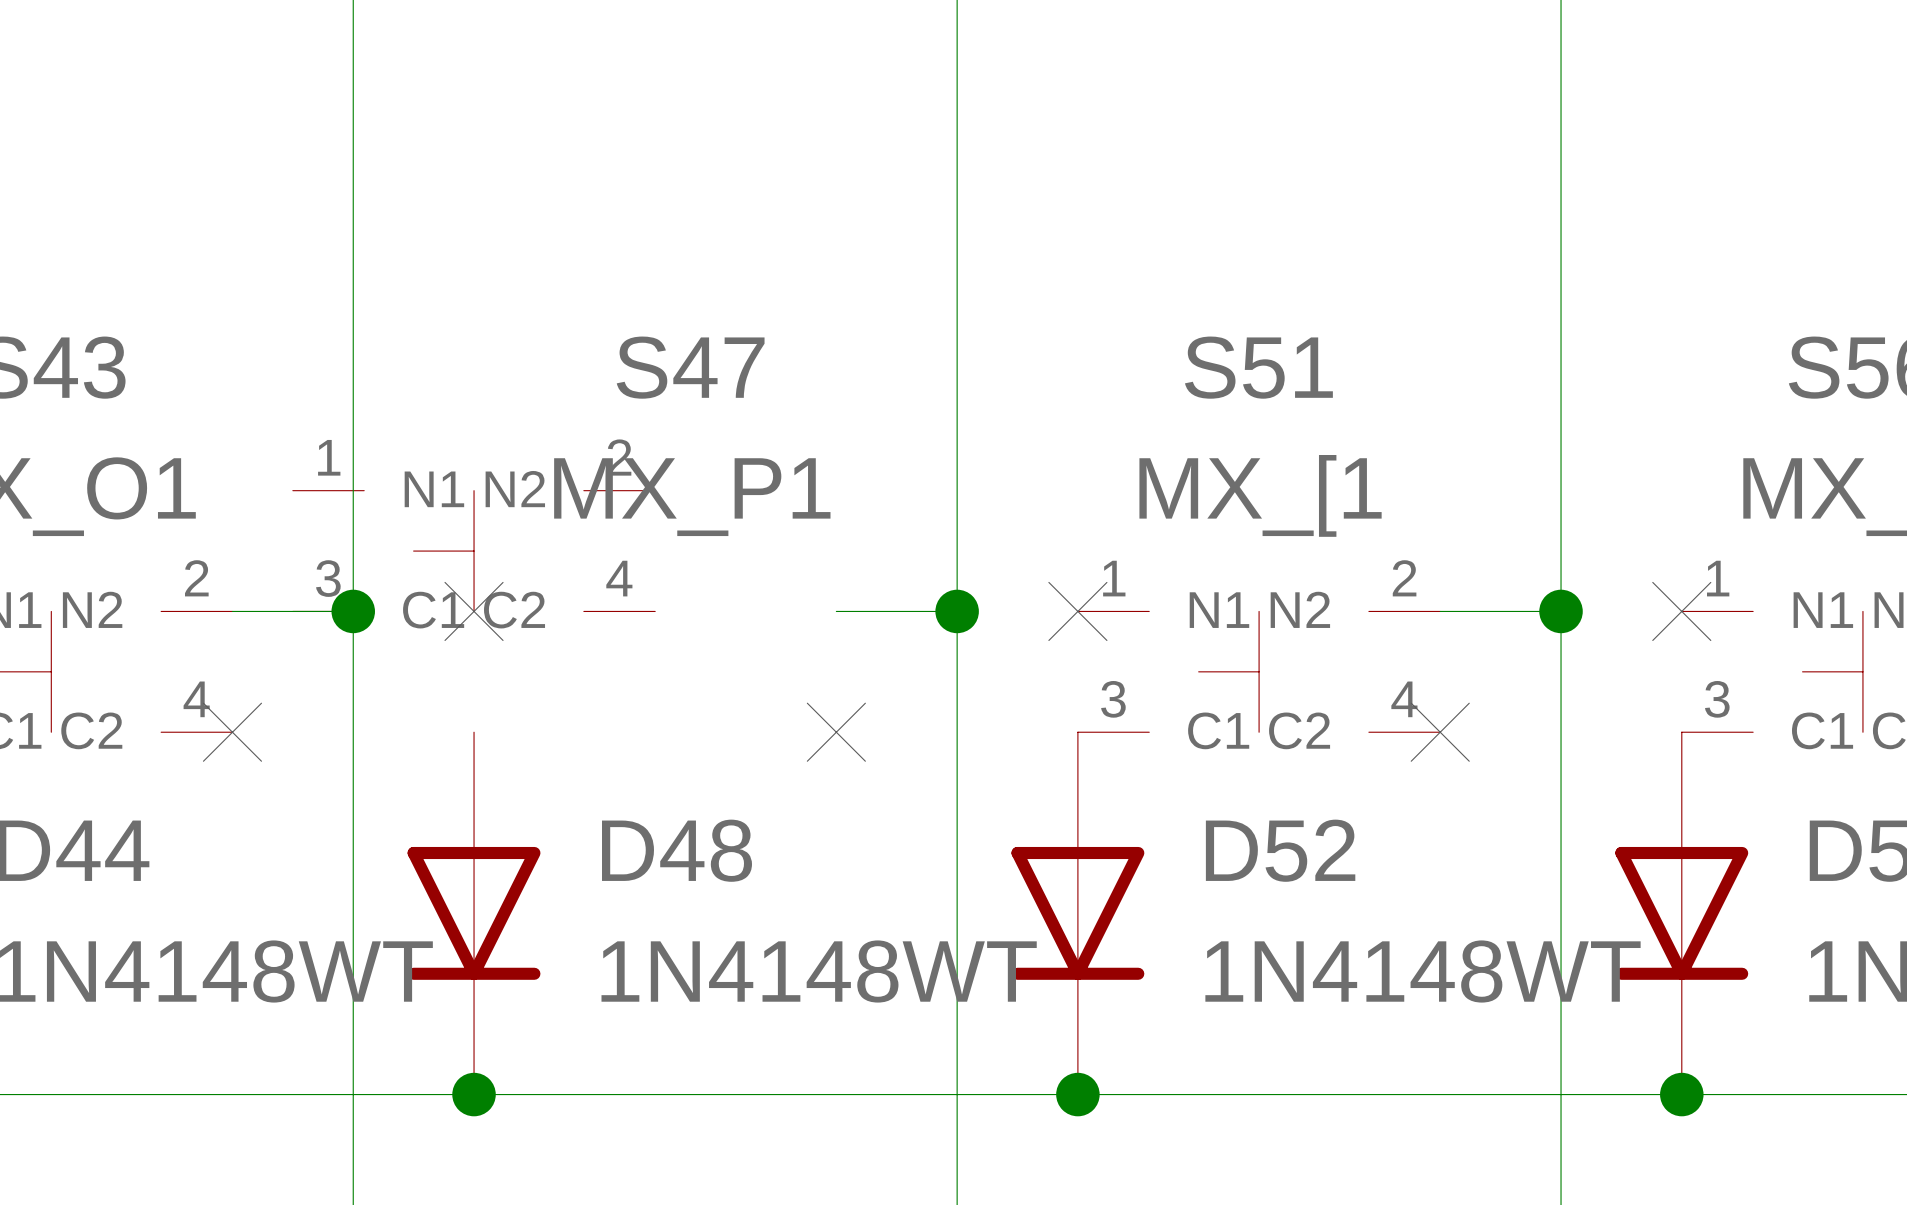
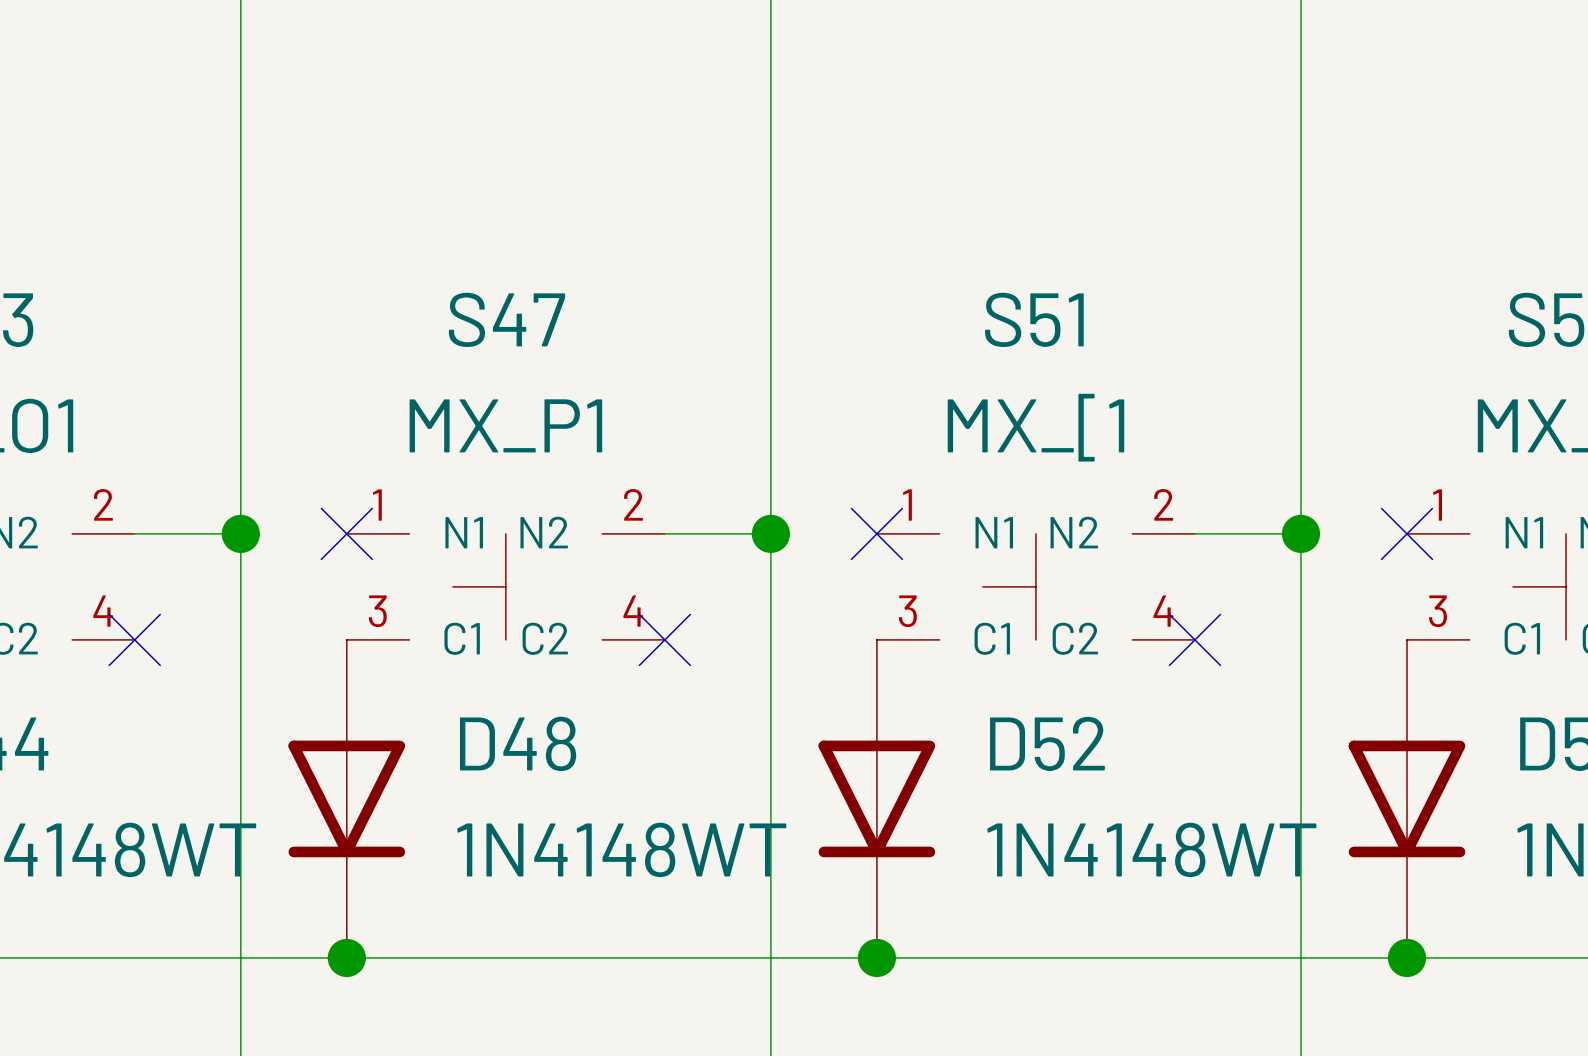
S47 name position: S47 (690, 367) -> S47 (506, 319)
S47 value position: MX_P1 (692, 497) -> MX_P1 (505, 425)
S47 position: (474, 551) -> (505, 586)

